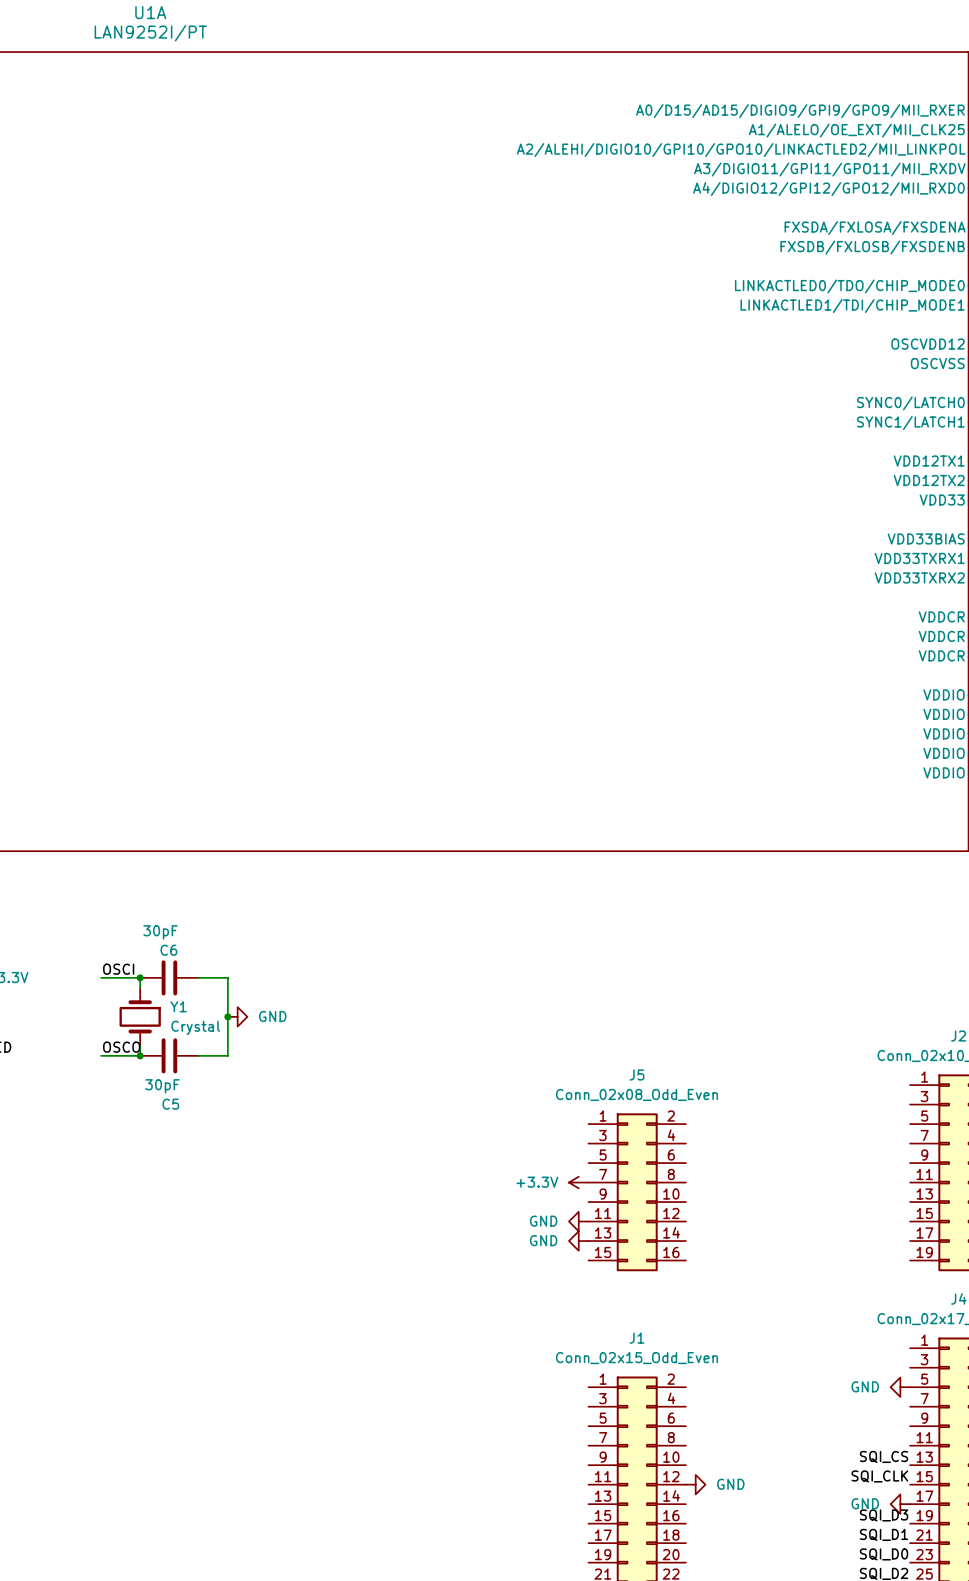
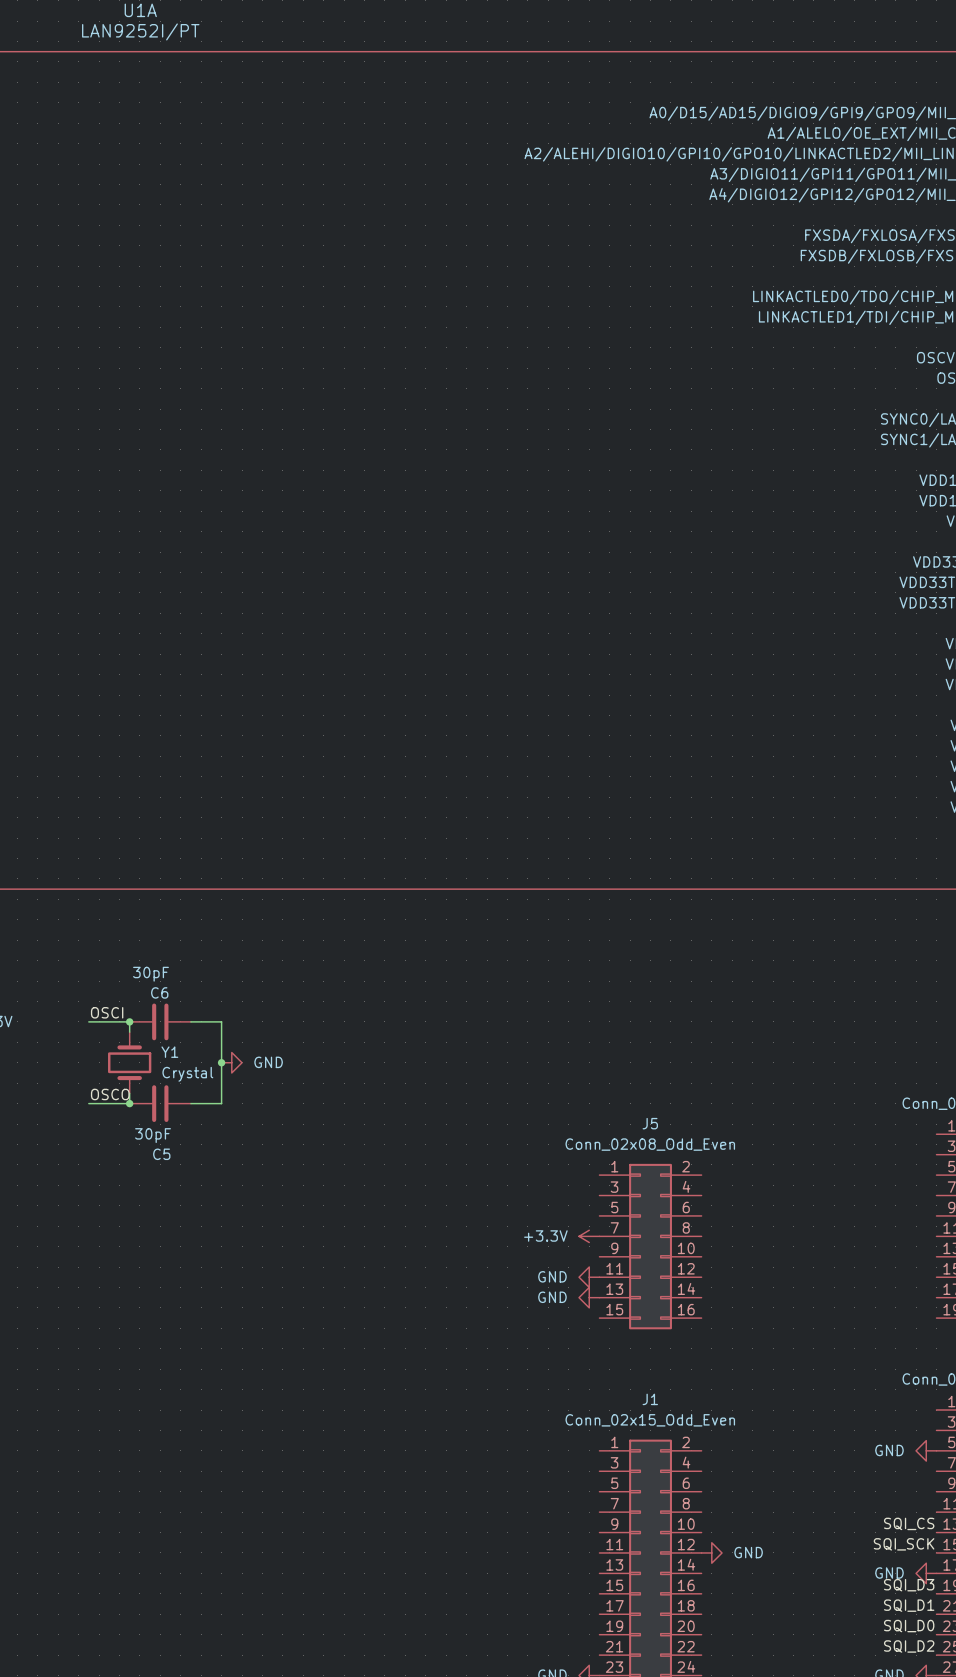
label: SQI_CLK (879, 1476) -> SQI_SCK (904, 1544)

